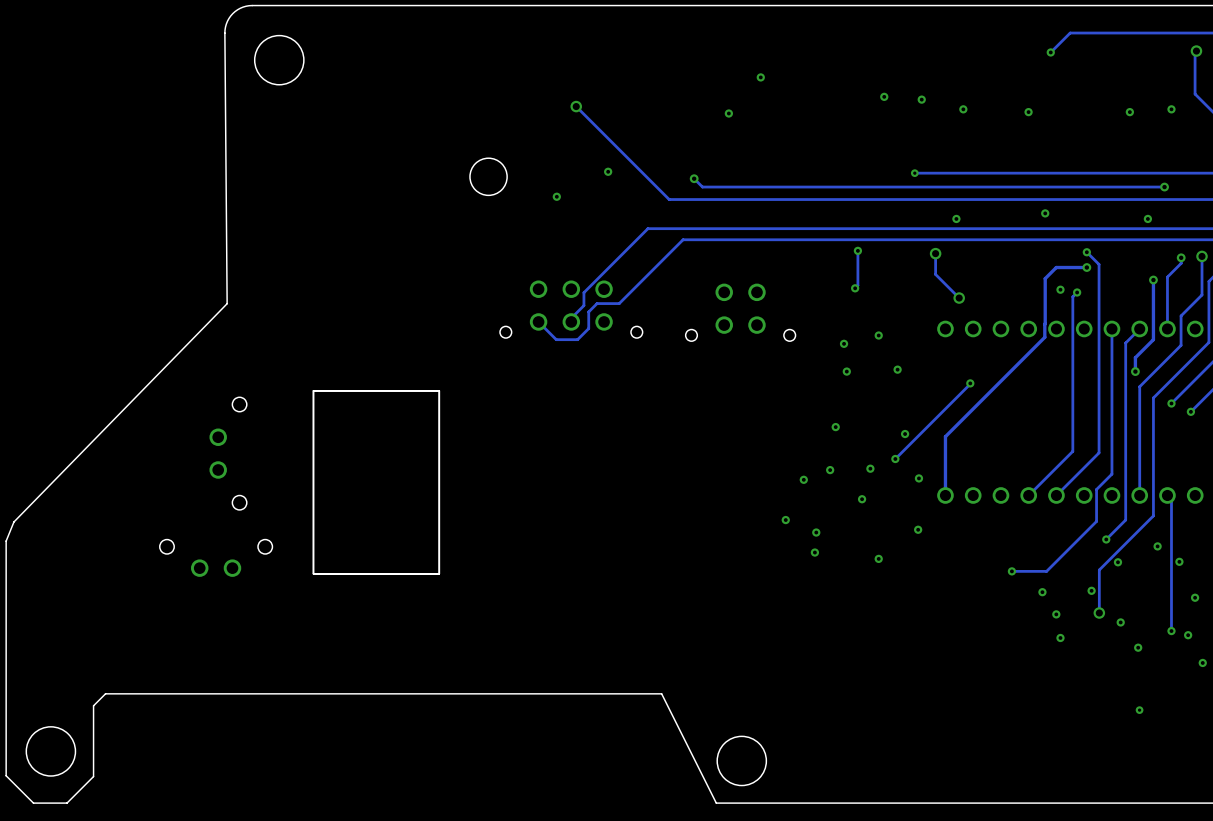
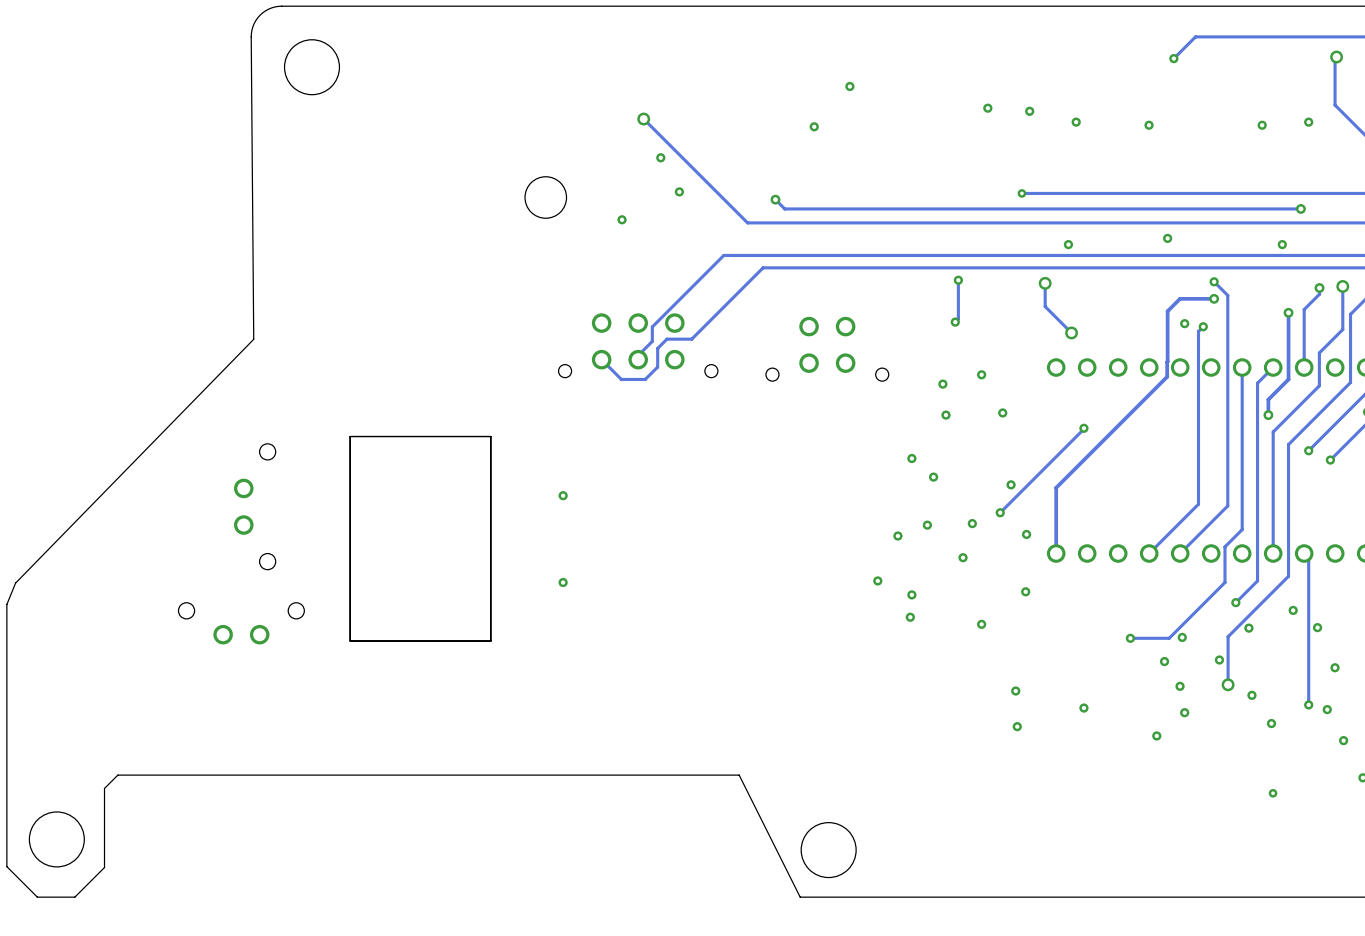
via: none -> (660, 157)
via: none -> (911, 458)
via: none -> (563, 495)
via: none -> (563, 582)
via: none -> (1182, 637)
via: none -> (1015, 691)
via: none -> (1083, 708)
via: none -> (1017, 726)
via: none -> (1156, 735)

